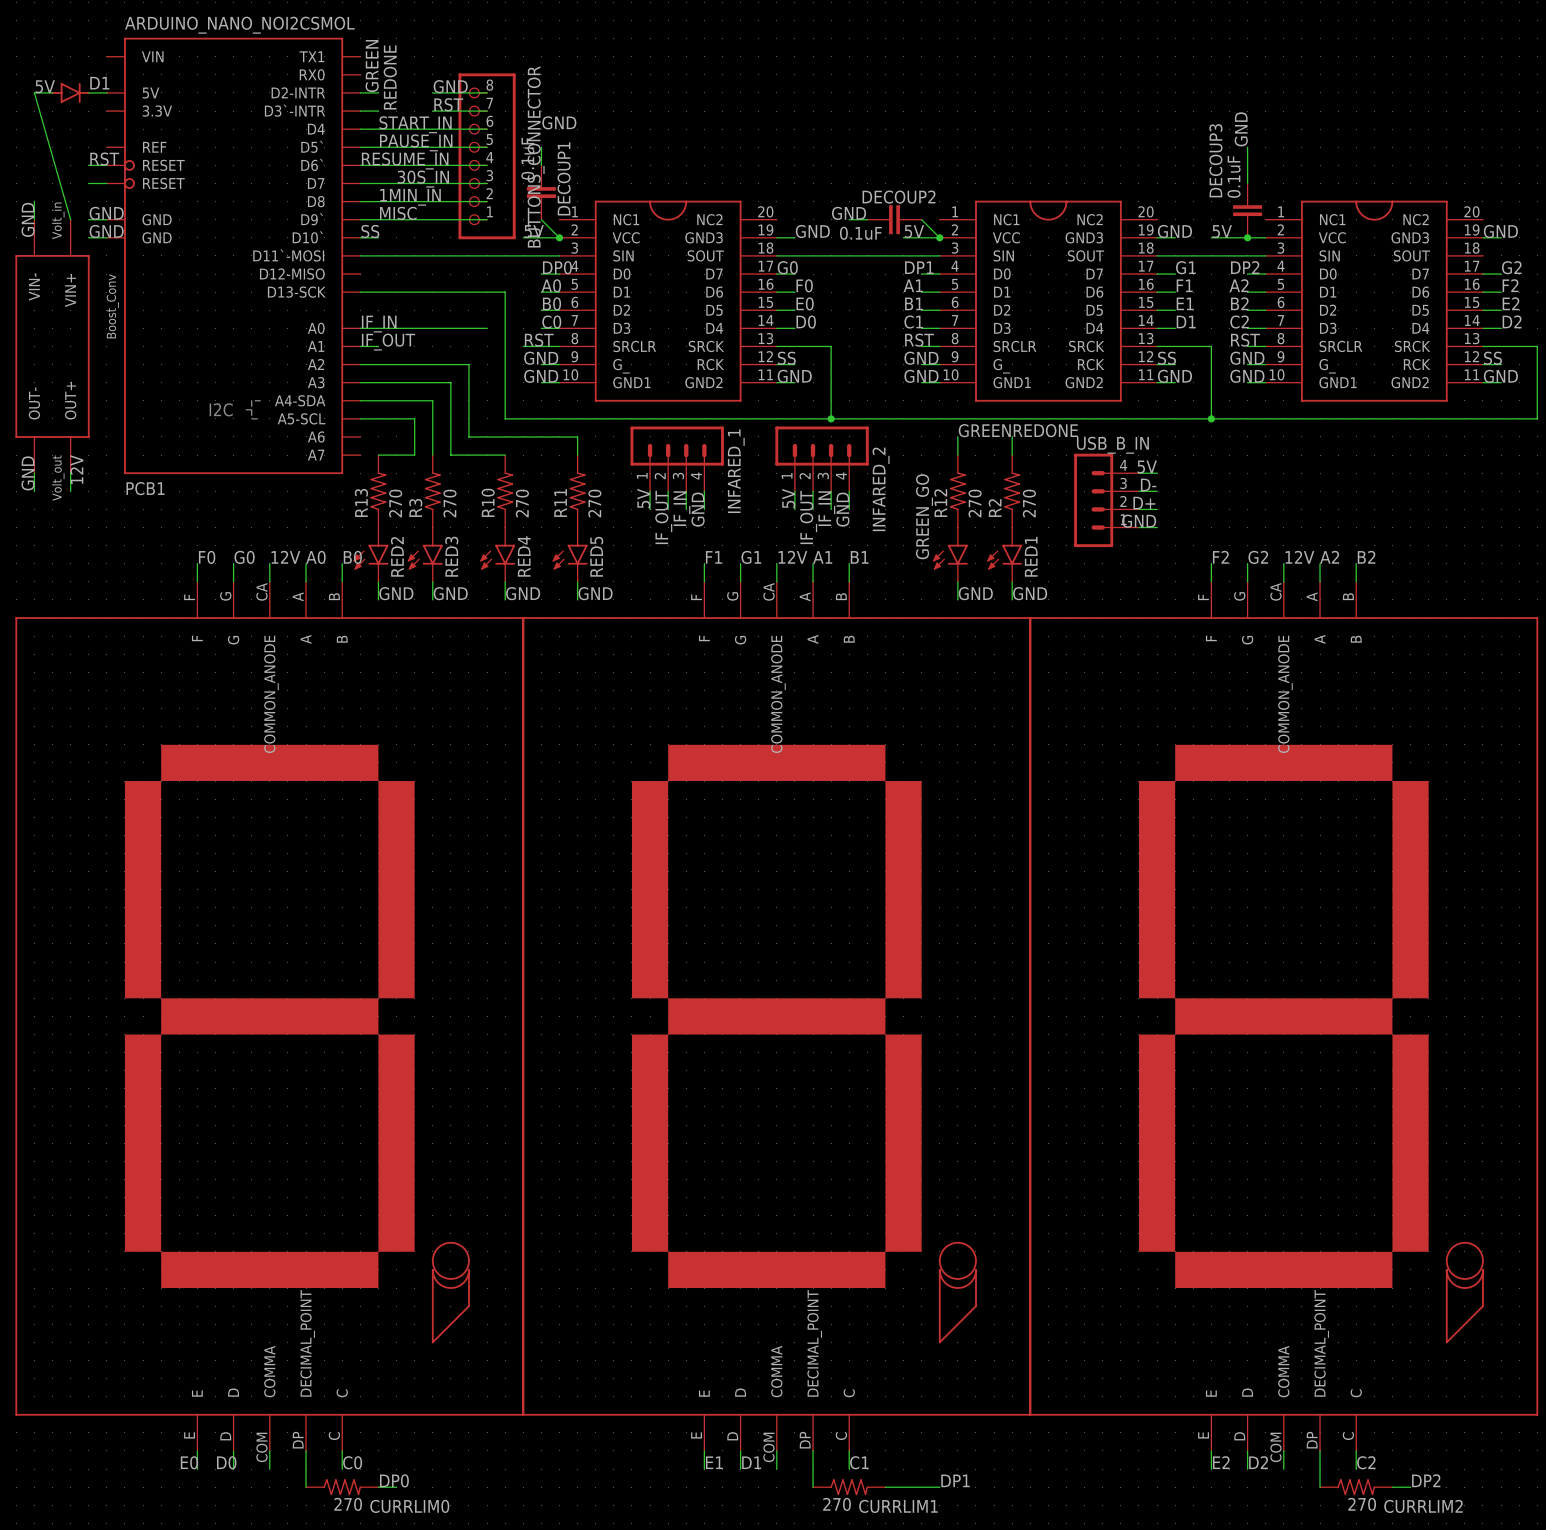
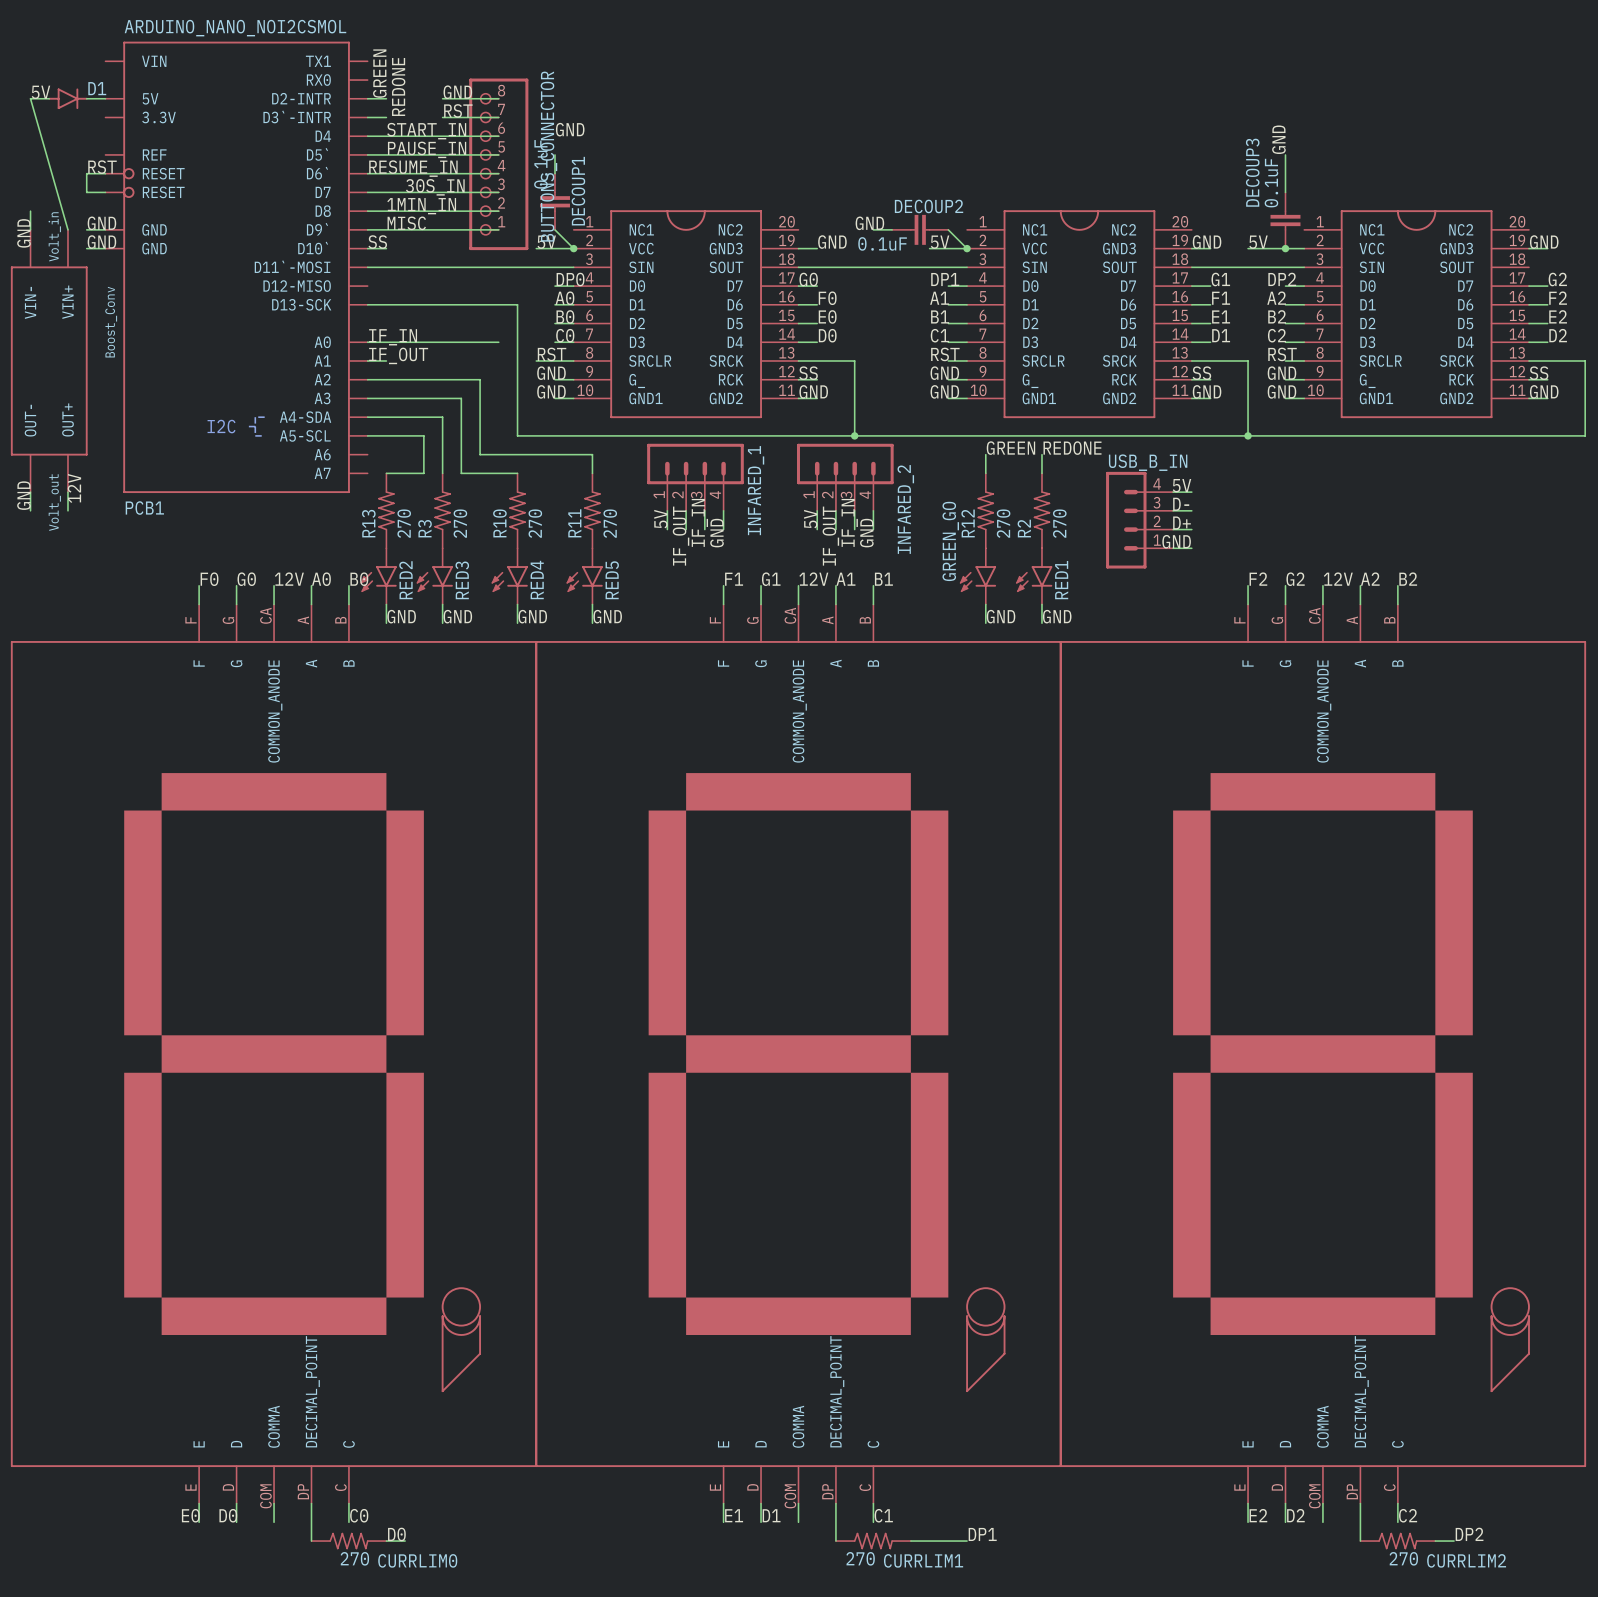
wire: none -> (86, 173) (86, 192)
label: DP0 (394, 1480) -> D0 (396, 1534)

